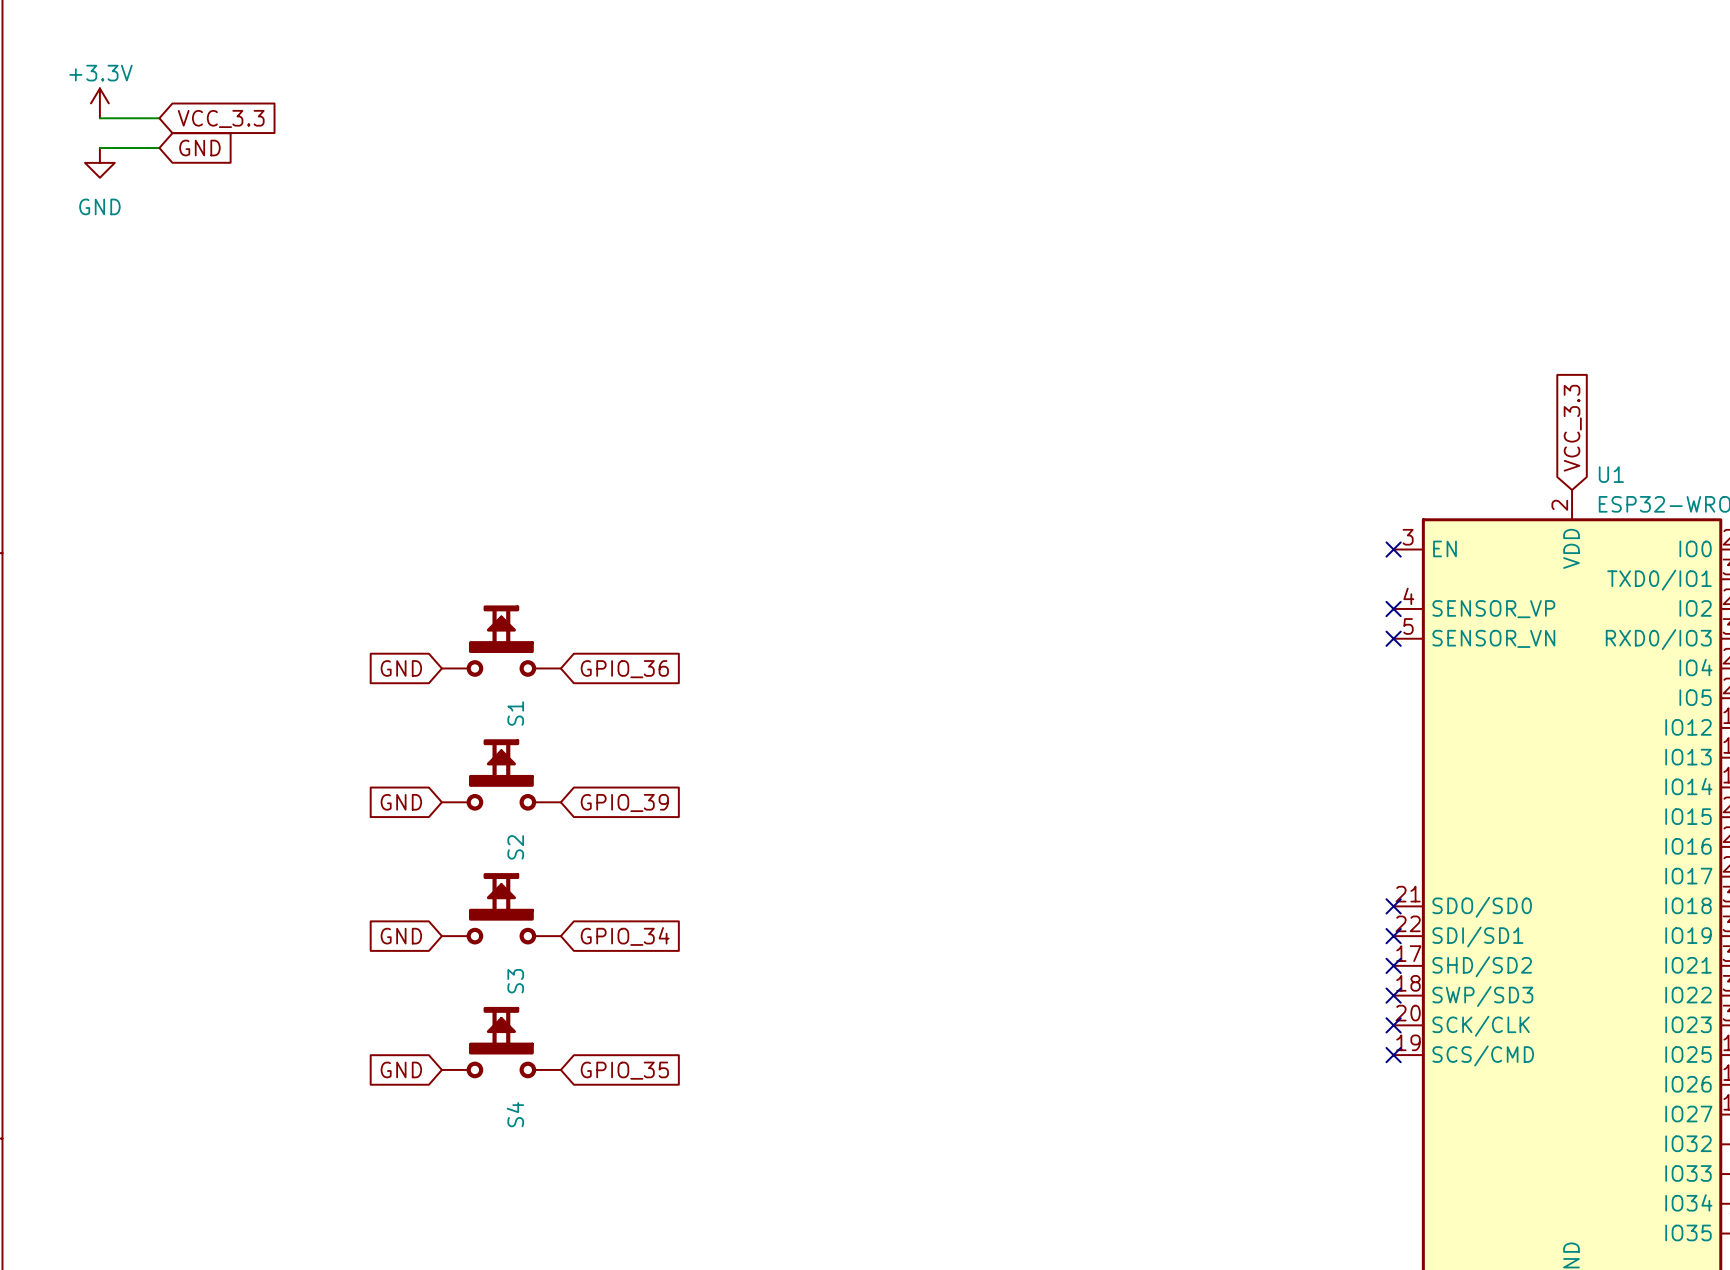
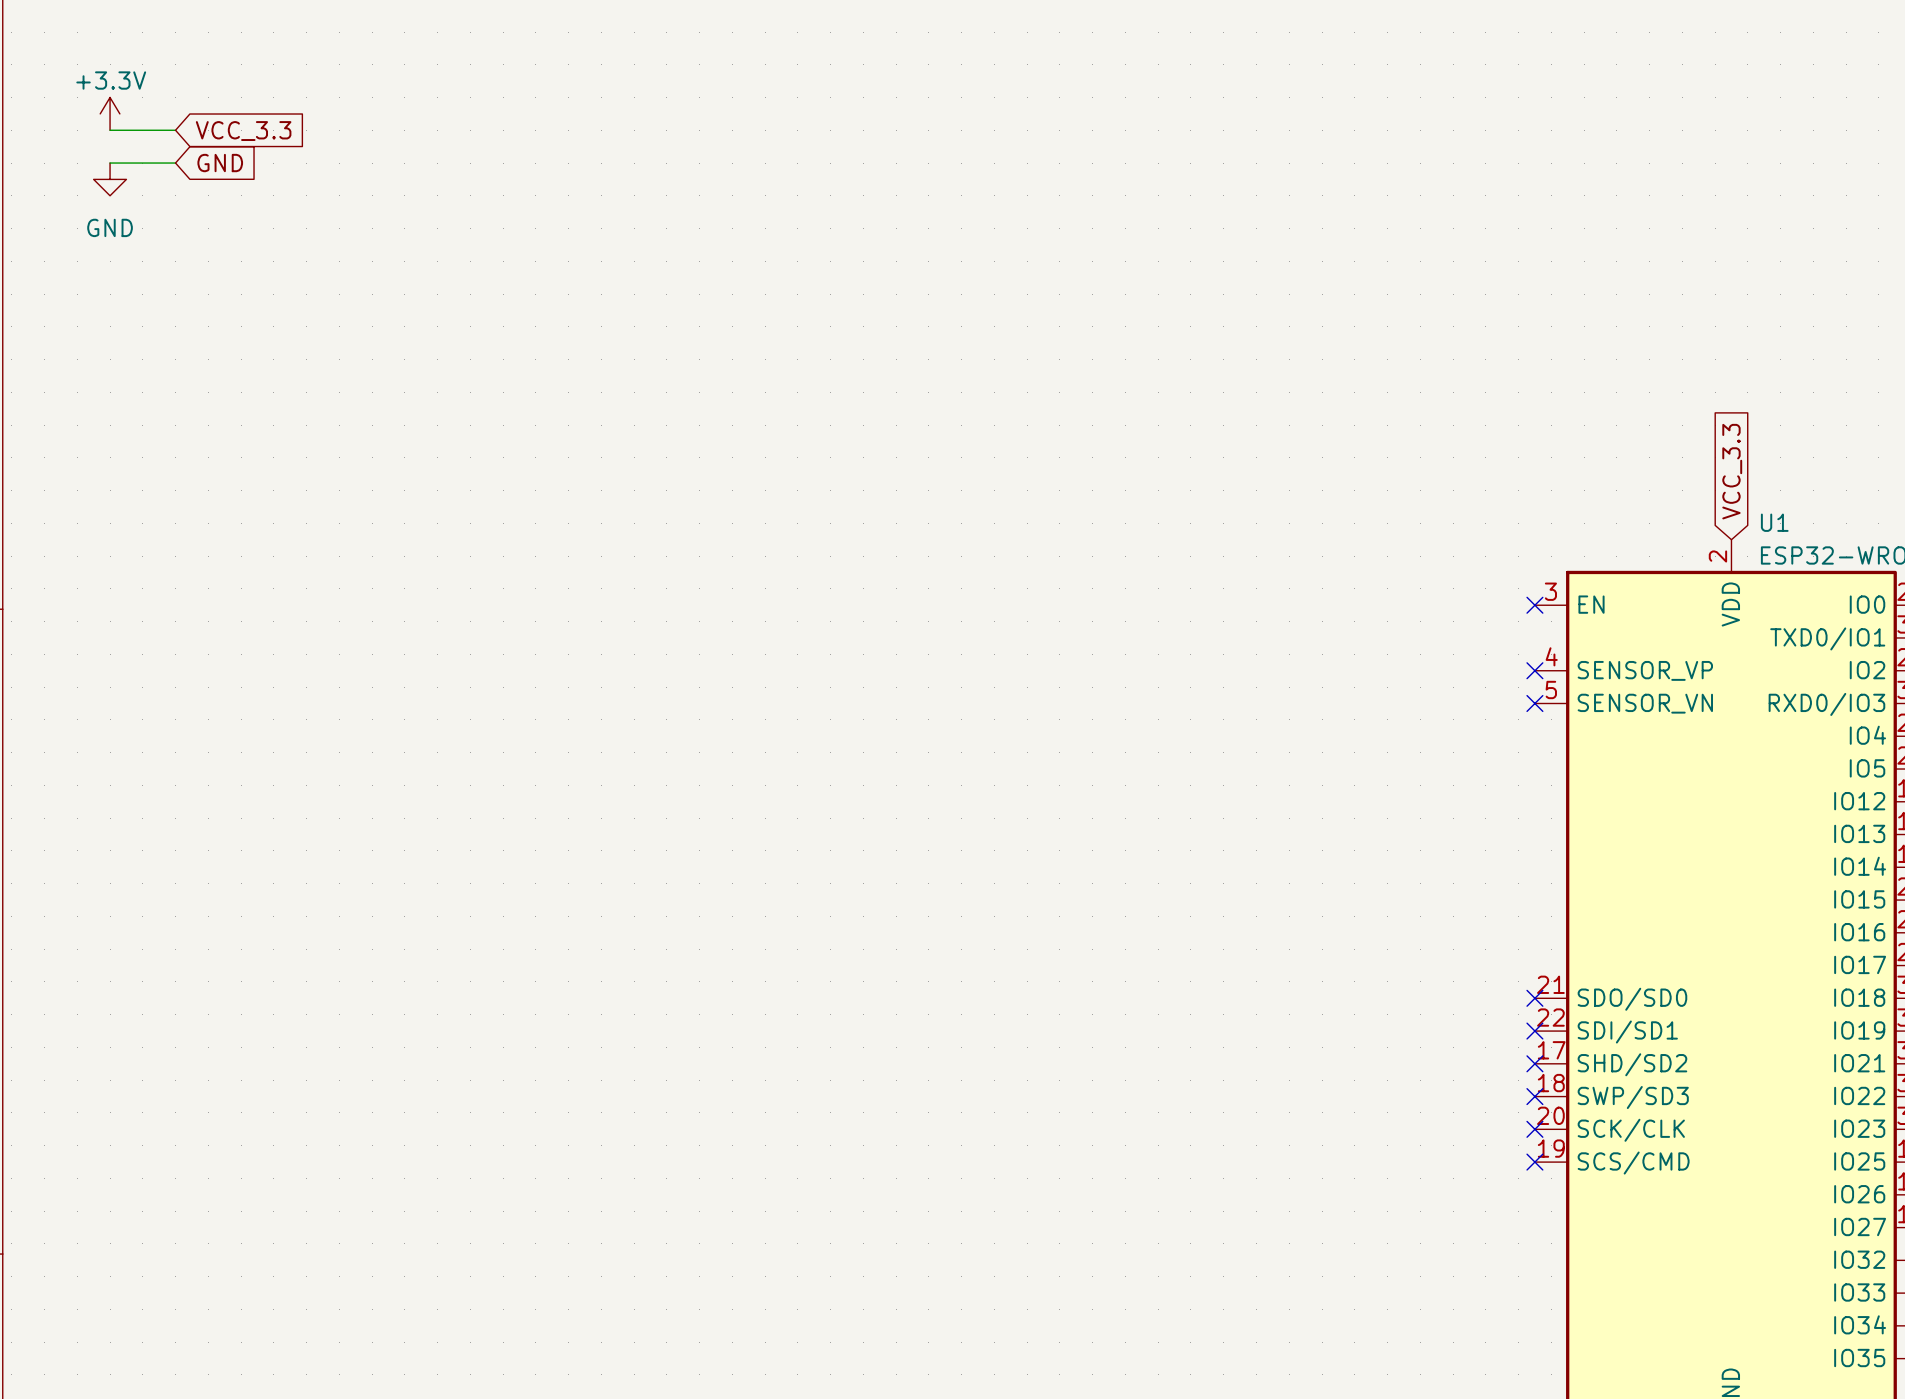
S1: (501, 641) -> none
global label: GND (401, 668) -> none
global label: GPIO_36 (624, 669) -> none
S2: (501, 774) -> none
global label: GND (401, 802) -> none
global label: GPIO_39 (624, 803) -> none
S3: (501, 908) -> none
global label: GND (401, 936) -> none
global label: GPIO_34 (625, 936) -> none
S4: (501, 1042) -> none
global label: GND (401, 1069) -> none
global label: GPIO_35 (624, 1070) -> none

